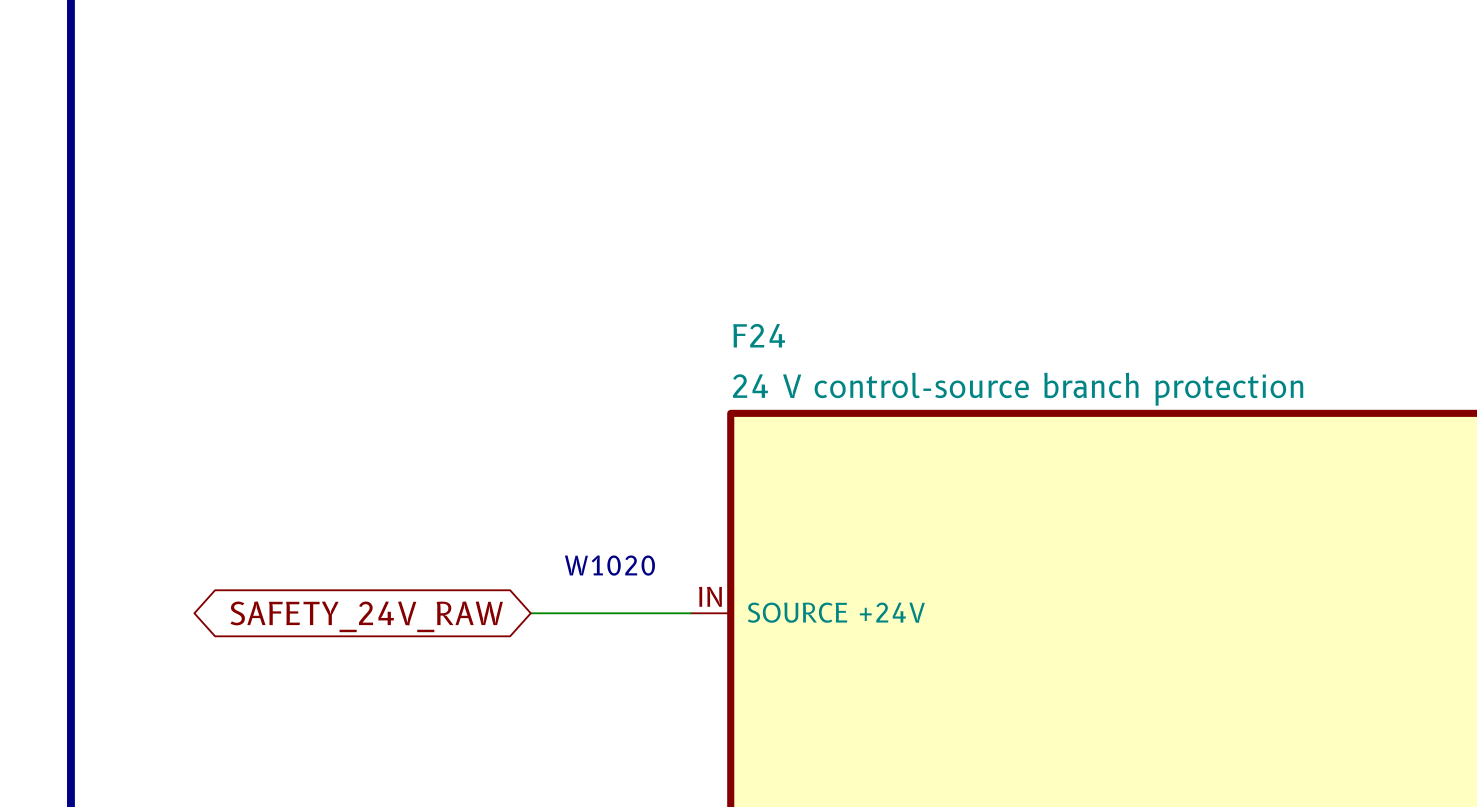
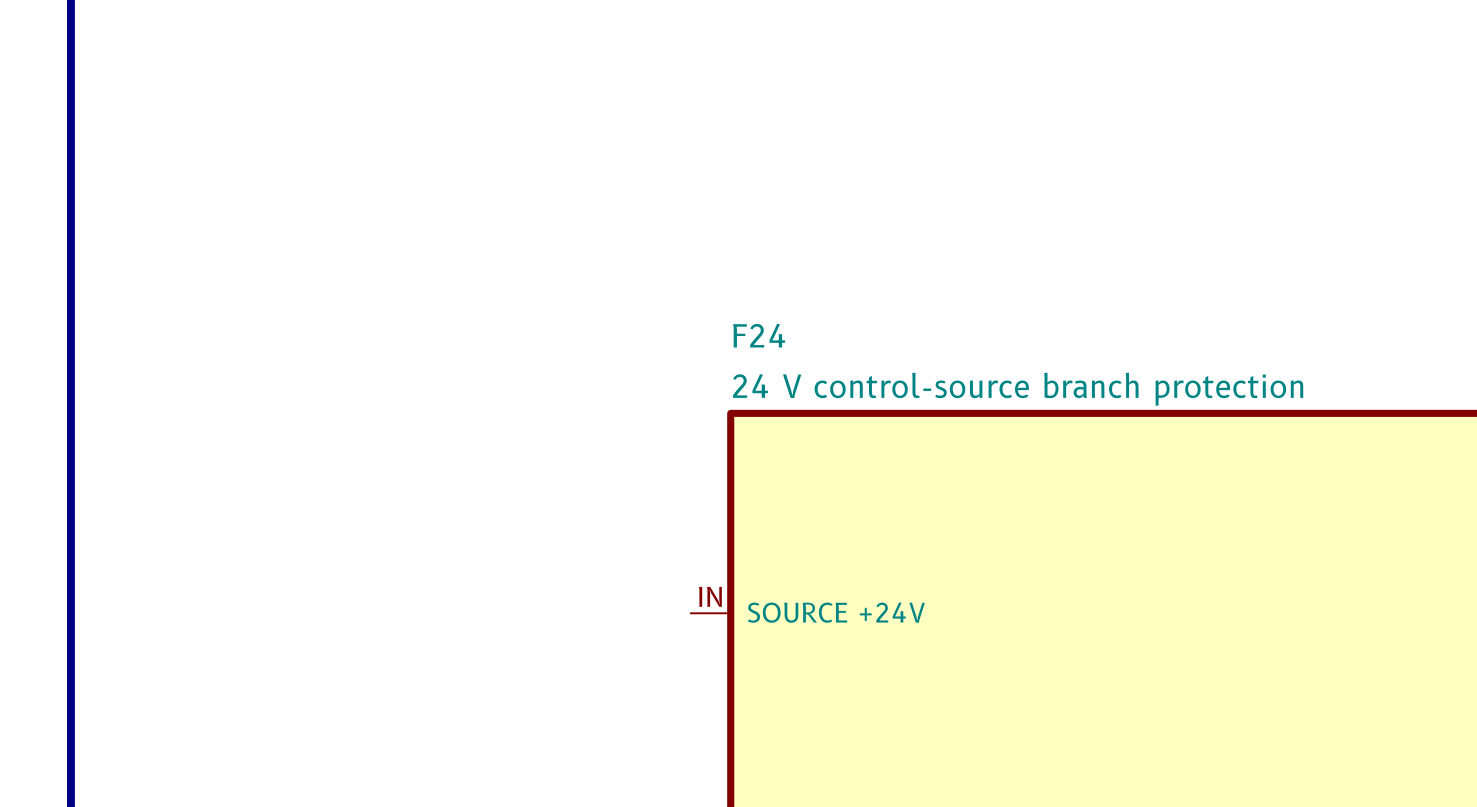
text: W1020 (609, 565) -> none
wire: (530, 613) (690, 613) -> none
global label: SAFETY_24V_RAW (366, 616) -> none

